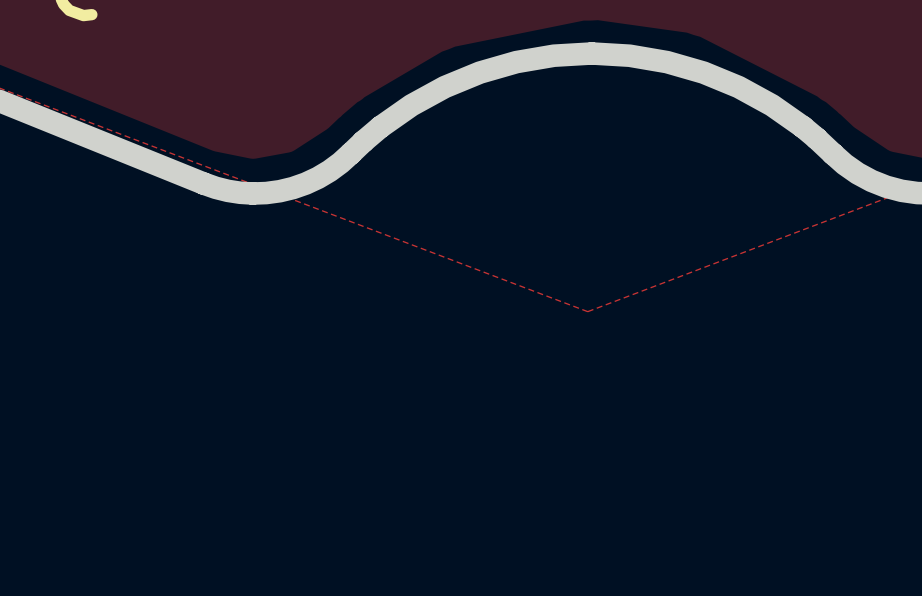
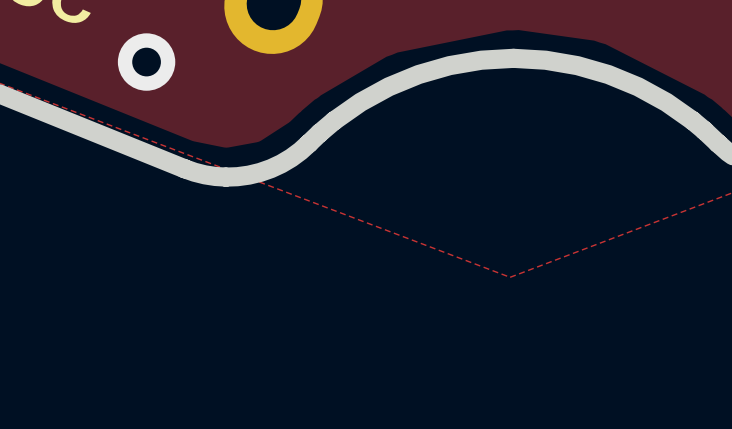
via: none -> (146, 62)

